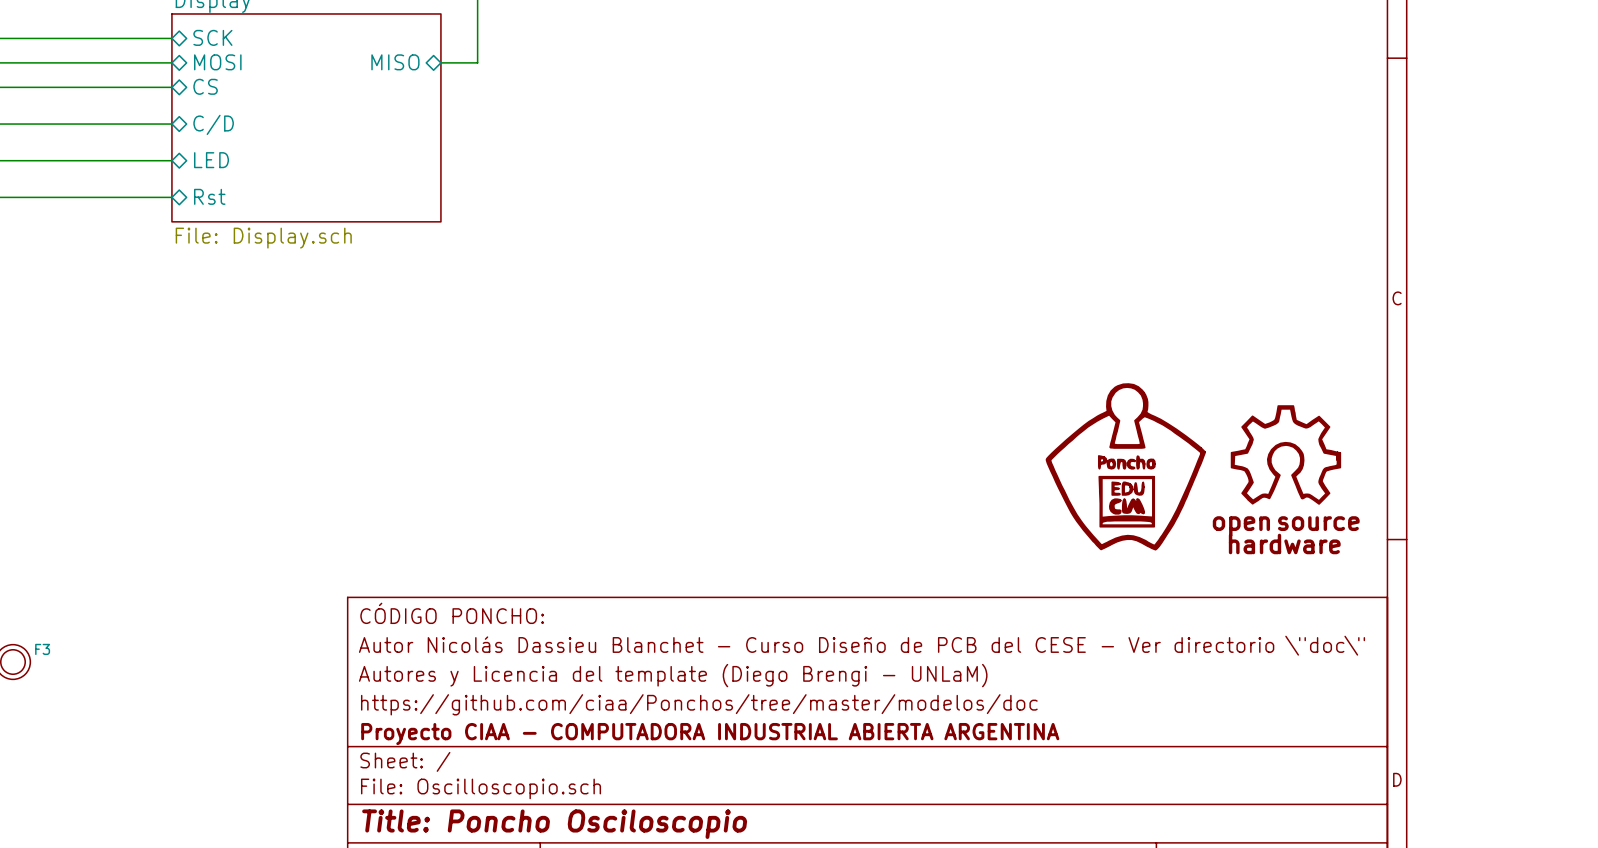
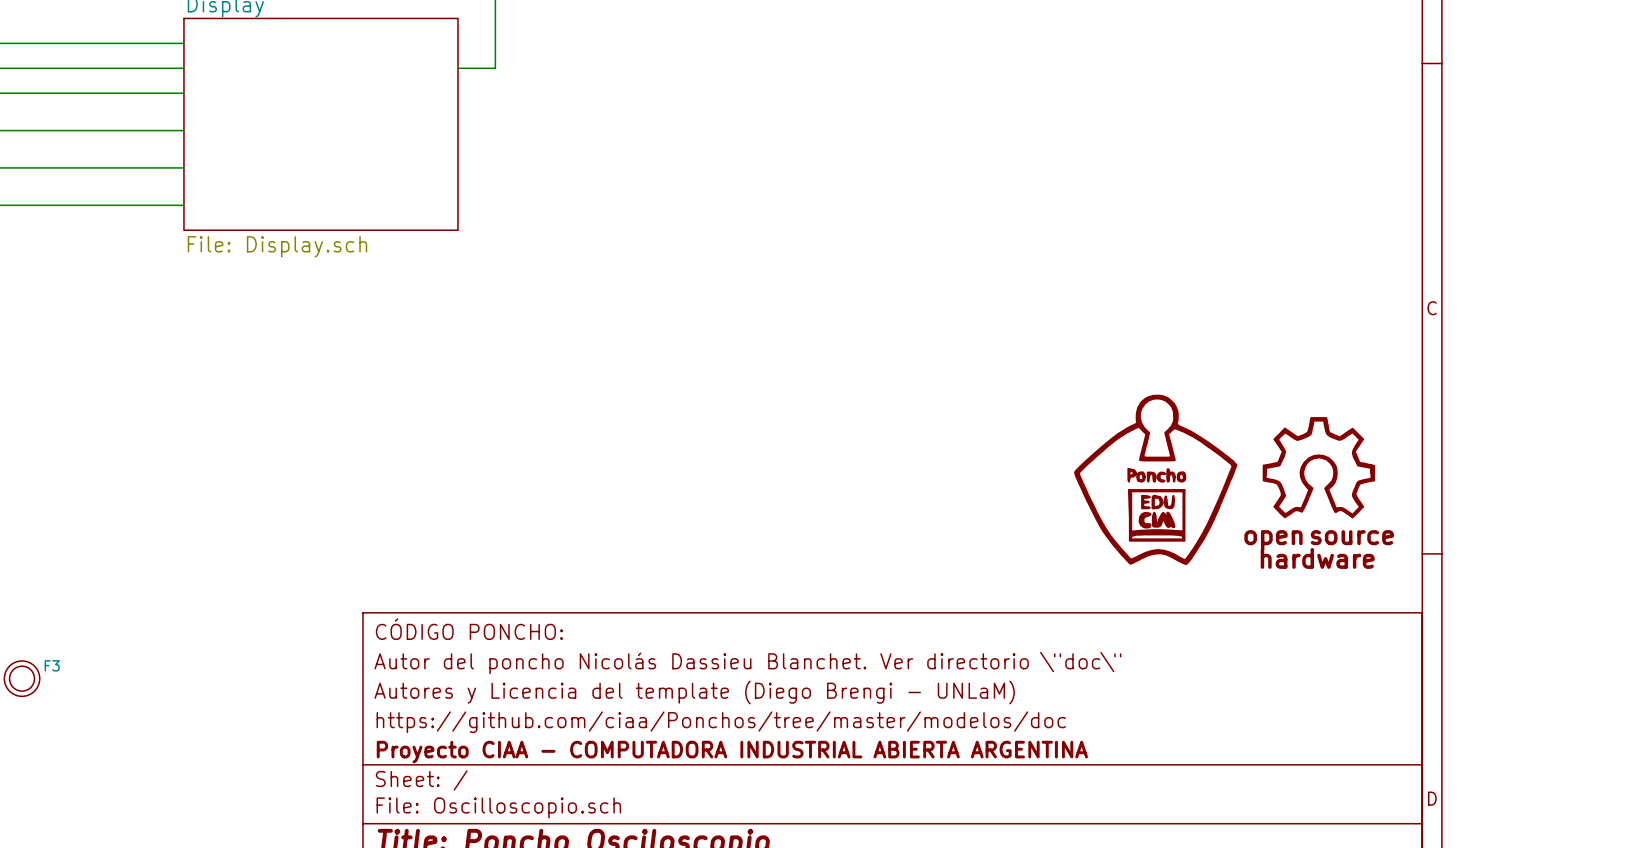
sheet pin: SCK (212, 37) -> none
sheet pin: MOSI (217, 62) -> none
sheet pin: MISO (395, 62) -> none
sheet pin: CS (205, 86) -> none
sheet pin: C/D (213, 124) -> none
sheet pin: LED (211, 160) -> none
sheet pin: Rst (209, 196) -> none
title block: Autor Nicolás Dassieu Blanchet - Curso Diseño de PCB del CESE - Ver directorio \"doc\" (861, 645) -> Autor del poncho Nicolás Dassieu Blanchet. Ver directorio \"doc\" (747, 663)

